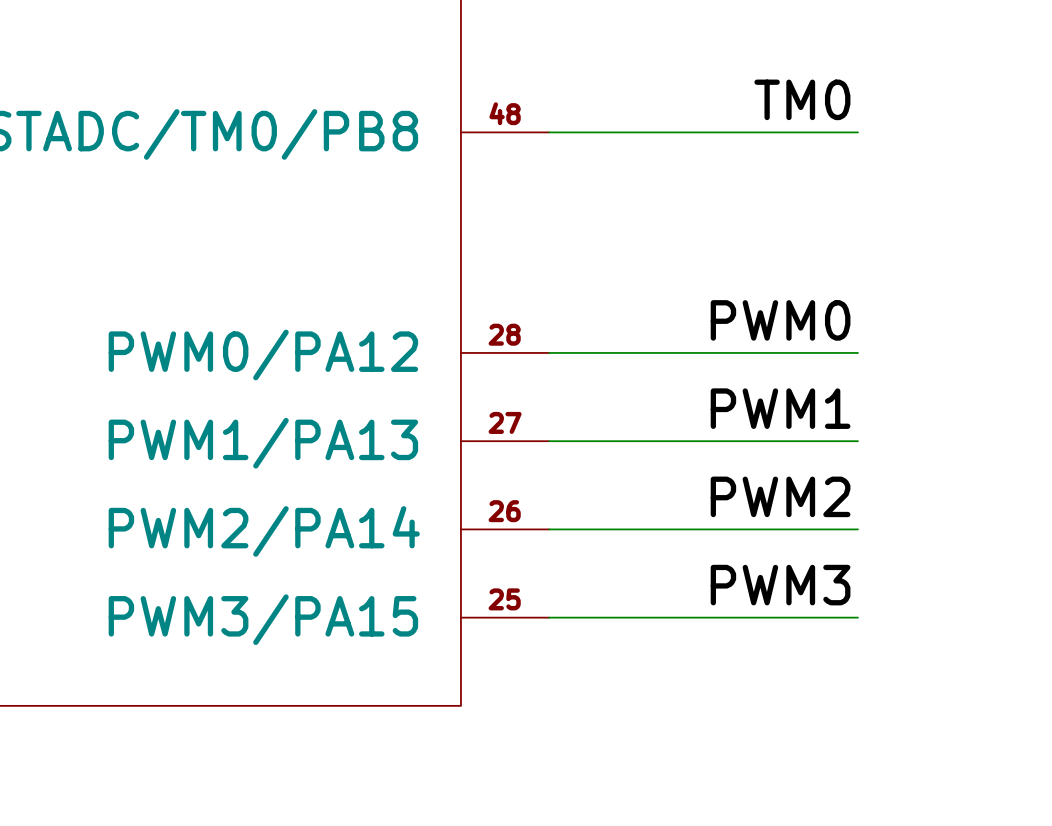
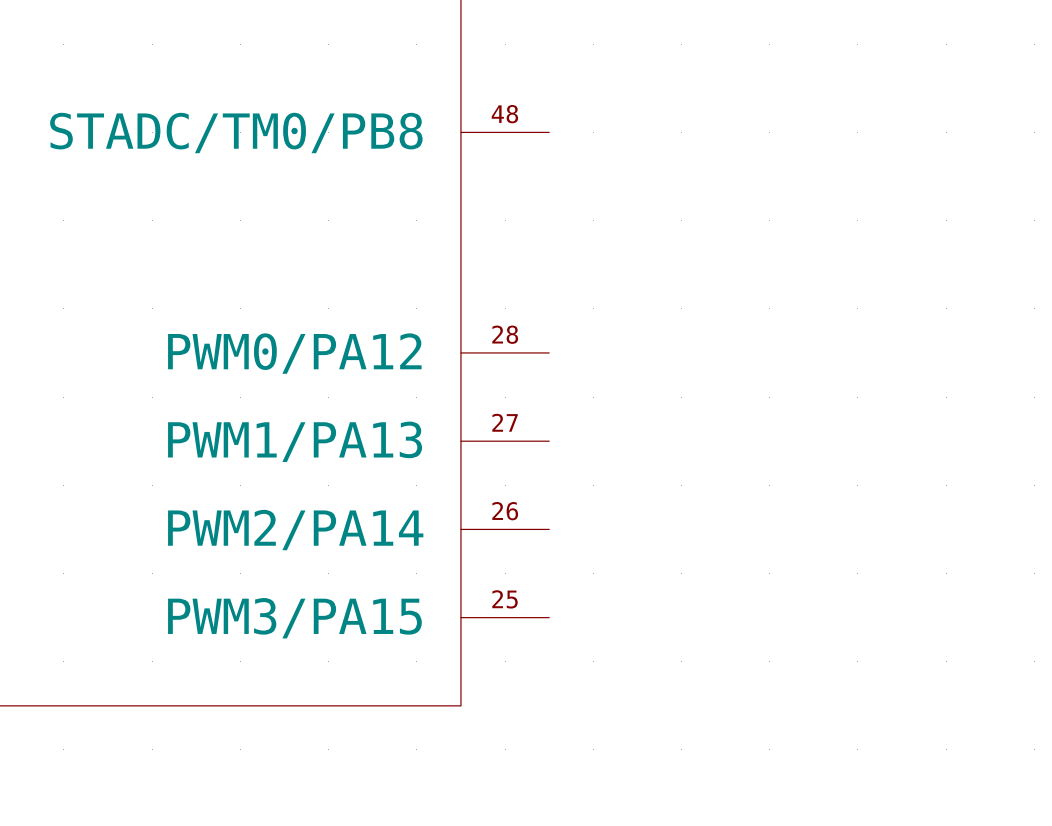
label: TM0 (802, 99) -> none
wire: (549, 132) (857, 132) -> none
label: PWM0 (780, 320) -> none
wire: (549, 352) (857, 352) -> none
label: PWM1 (780, 408) -> none
wire: (549, 441) (857, 441) -> none
label: PWM2 (780, 496) -> none
wire: (549, 529) (857, 529) -> none
label: PWM3 (780, 585) -> none
wire: (549, 617) (857, 617) -> none

